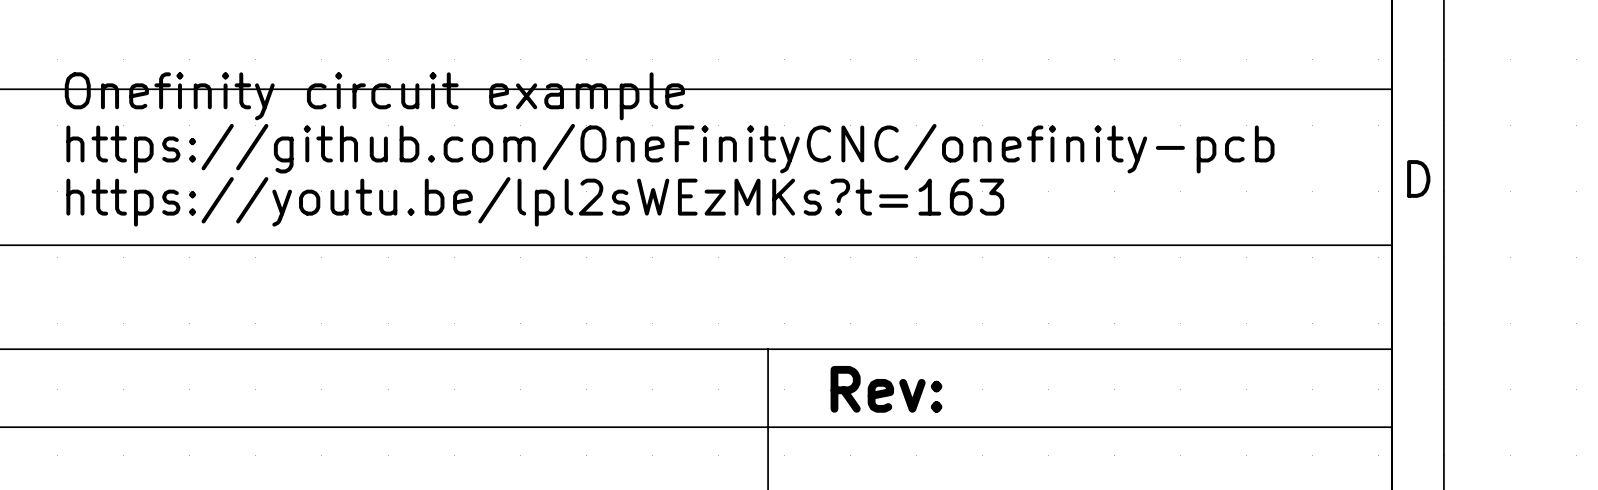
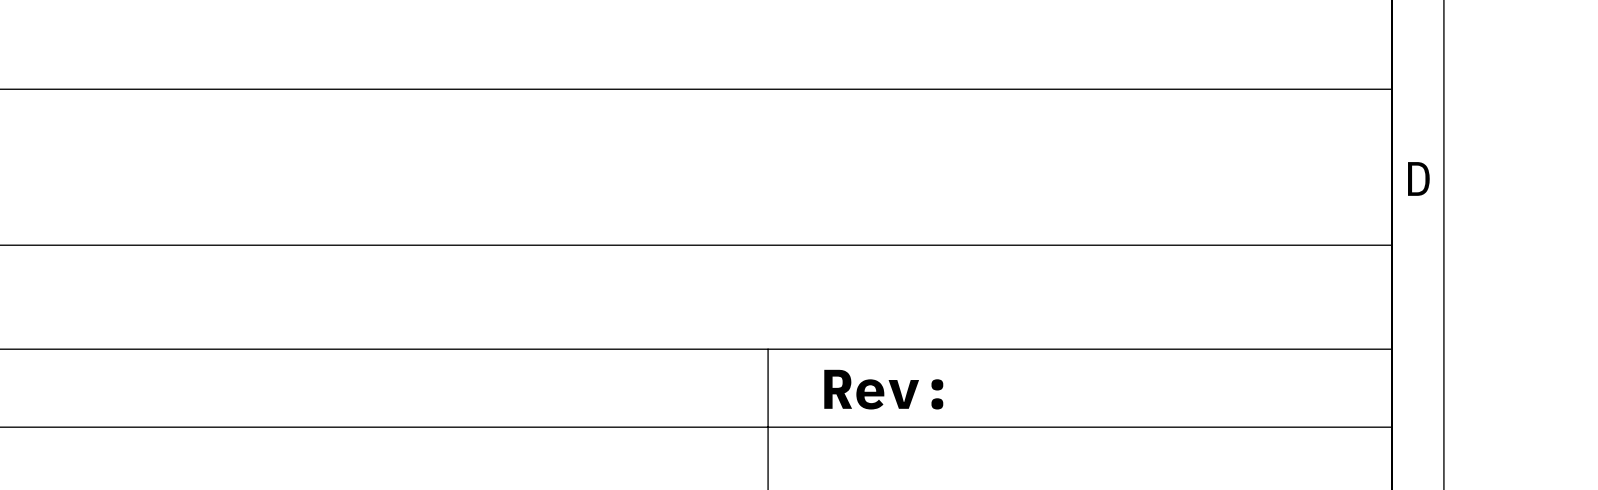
text: Onefinity circuit example (374, 96) -> none
text: https://github.com/OneFinityCNC/onefinity-pcb (670, 148) -> none
text: https://youtu.be/lpl2sWEzMKs?t=163 (535, 201) -> none

